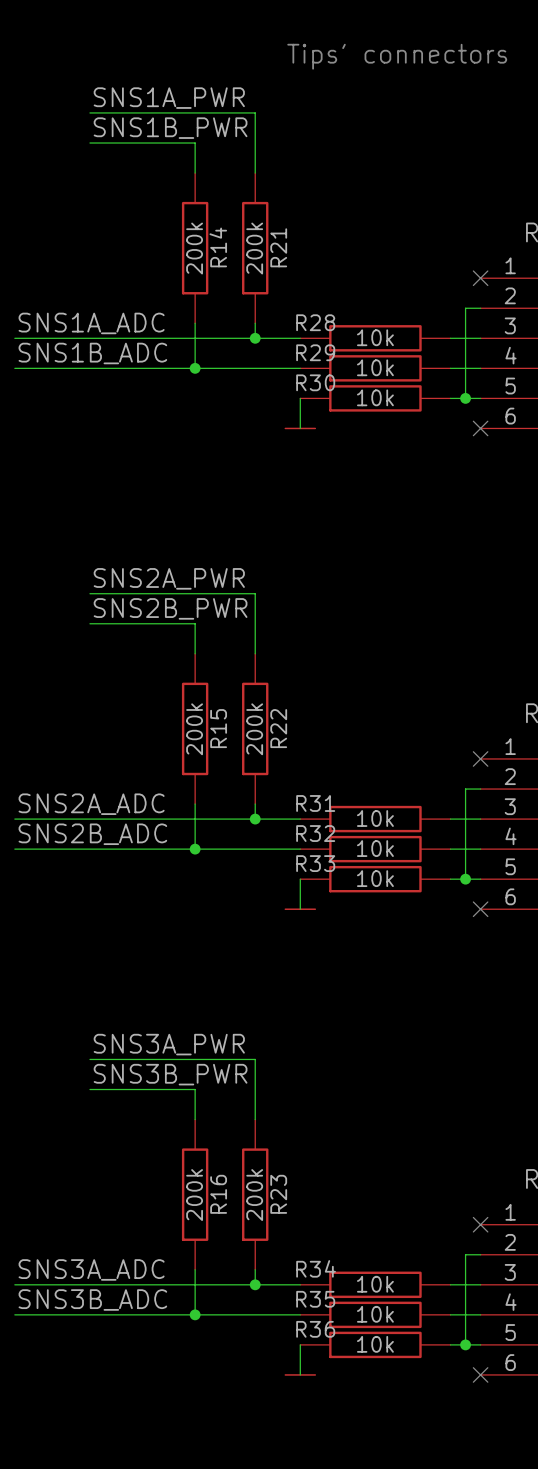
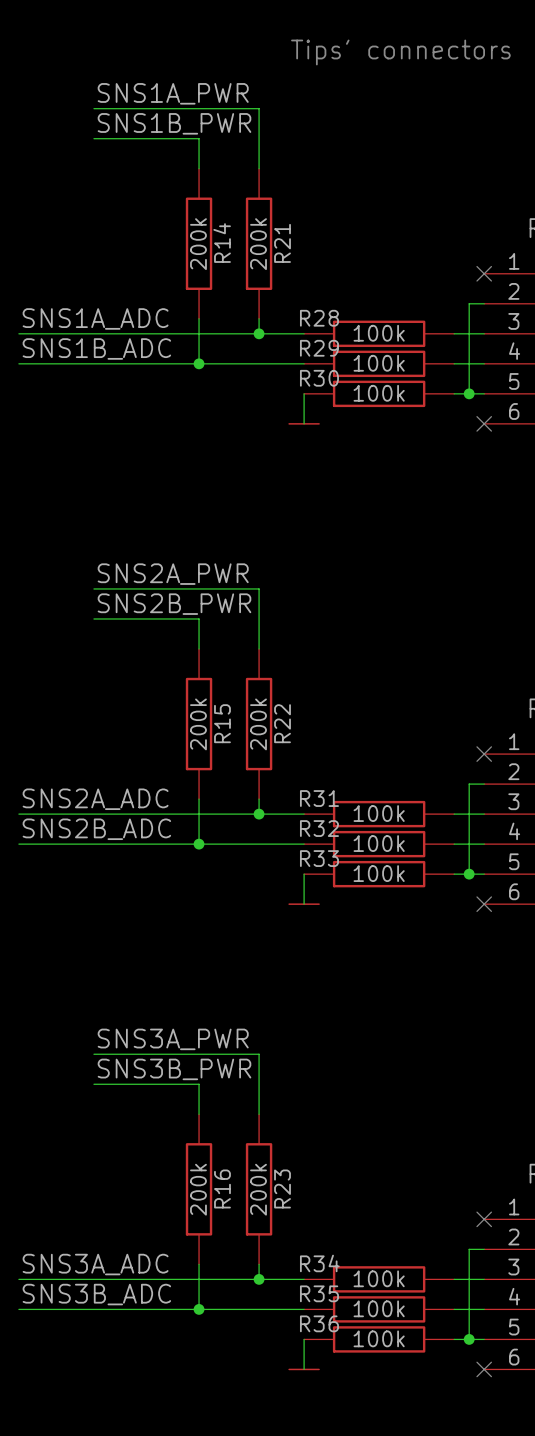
R28 value: 10k (375, 337) -> 100k (379, 333)
R29 value: 10k (375, 367) -> 100k (379, 363)
R30 value: 10k (375, 397) -> 100k (379, 393)
R31 value: 10k (375, 818) -> 100k (379, 813)
R32 value: 10k (375, 848) -> 100k (379, 843)
R33 value: 10k (375, 878) -> 100k (379, 873)
R34 value: 10k (375, 1284) -> 100k (379, 1278)
R35 value: 10k (375, 1314) -> 100k (379, 1308)
R36 value: 10k (375, 1344) -> 100k (379, 1338)

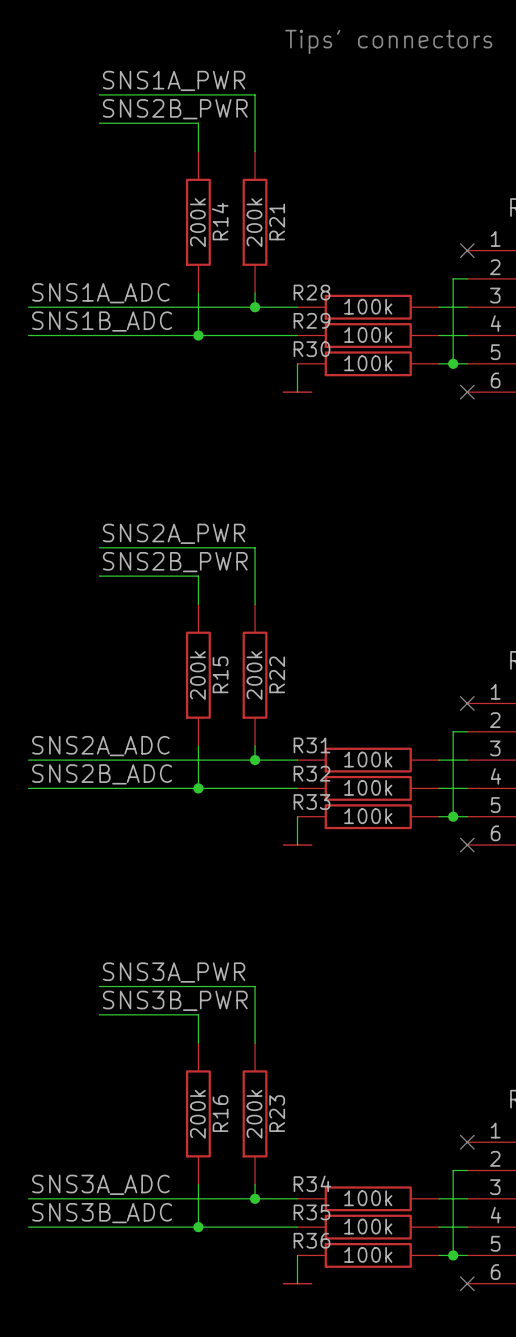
label: SNS1B_PWR (174, 123) -> SNS2B_PWR (175, 109)

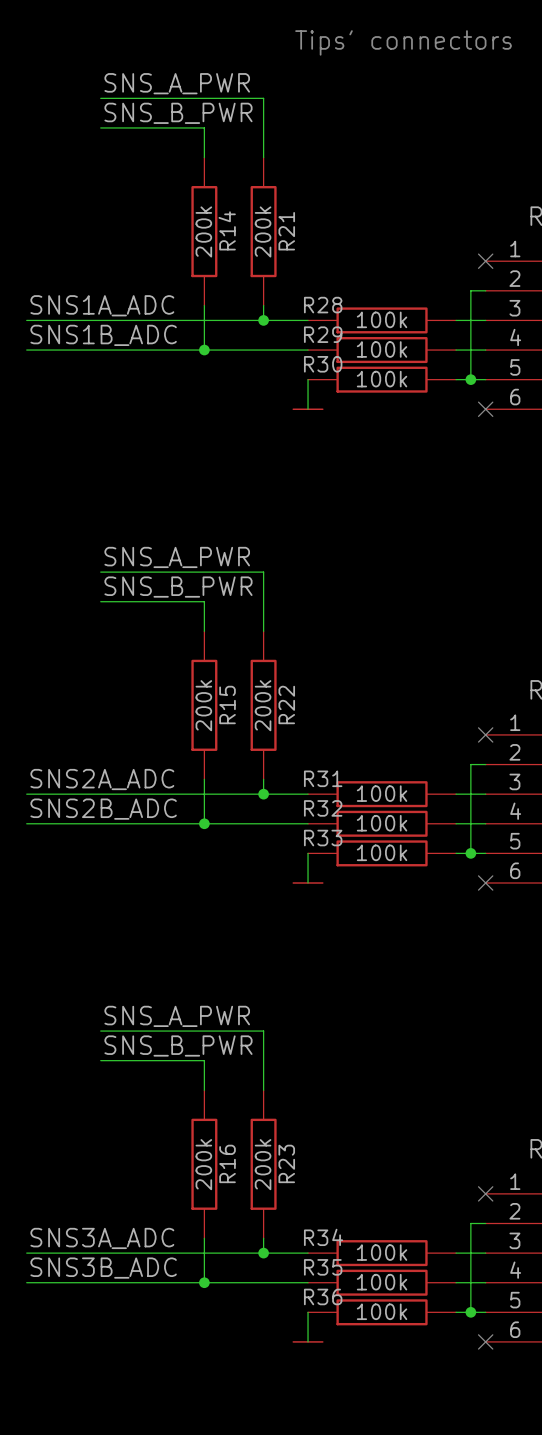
label: SNS1A_PWR (174, 80) -> SNS_A_PWR (177, 83)
label: SNS2B_PWR (175, 109) -> SNS_B_PWR (178, 113)
label: SNS2A_PWR (174, 533) -> SNS_A_PWR (177, 557)
label: SNS2B_PWR (175, 562) -> SNS_B_PWR (178, 587)
label: SNS3A_PWR (174, 972) -> SNS_A_PWR (177, 1016)
label: SNS3B_PWR (175, 1000) -> SNS_B_PWR (178, 1046)

